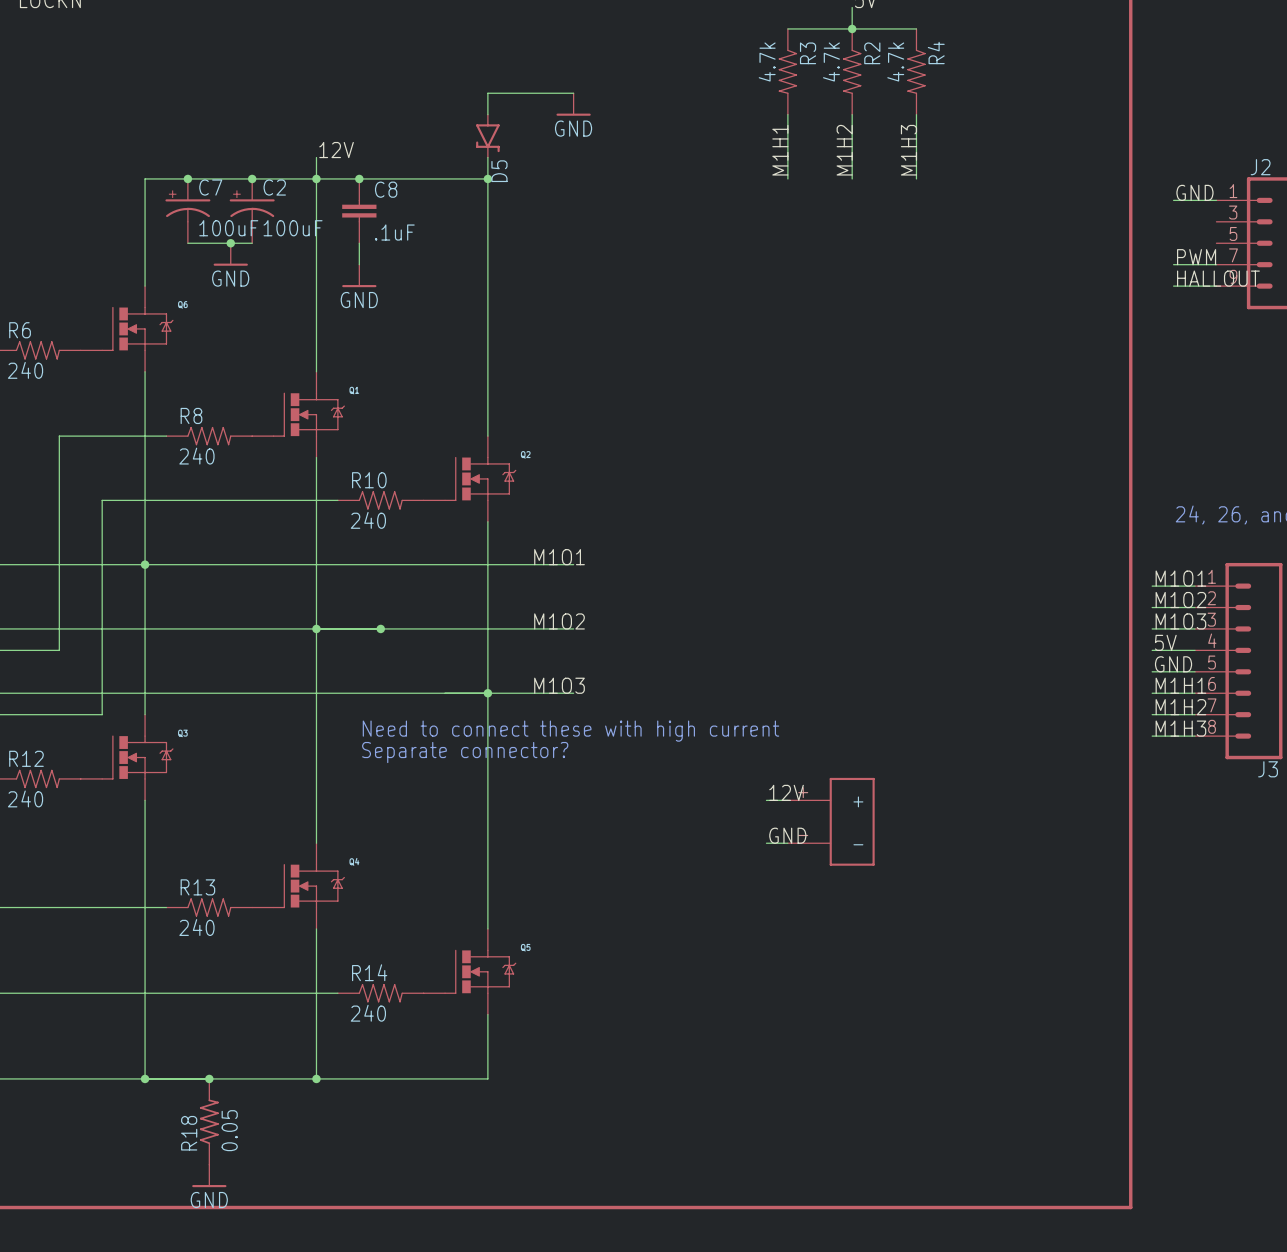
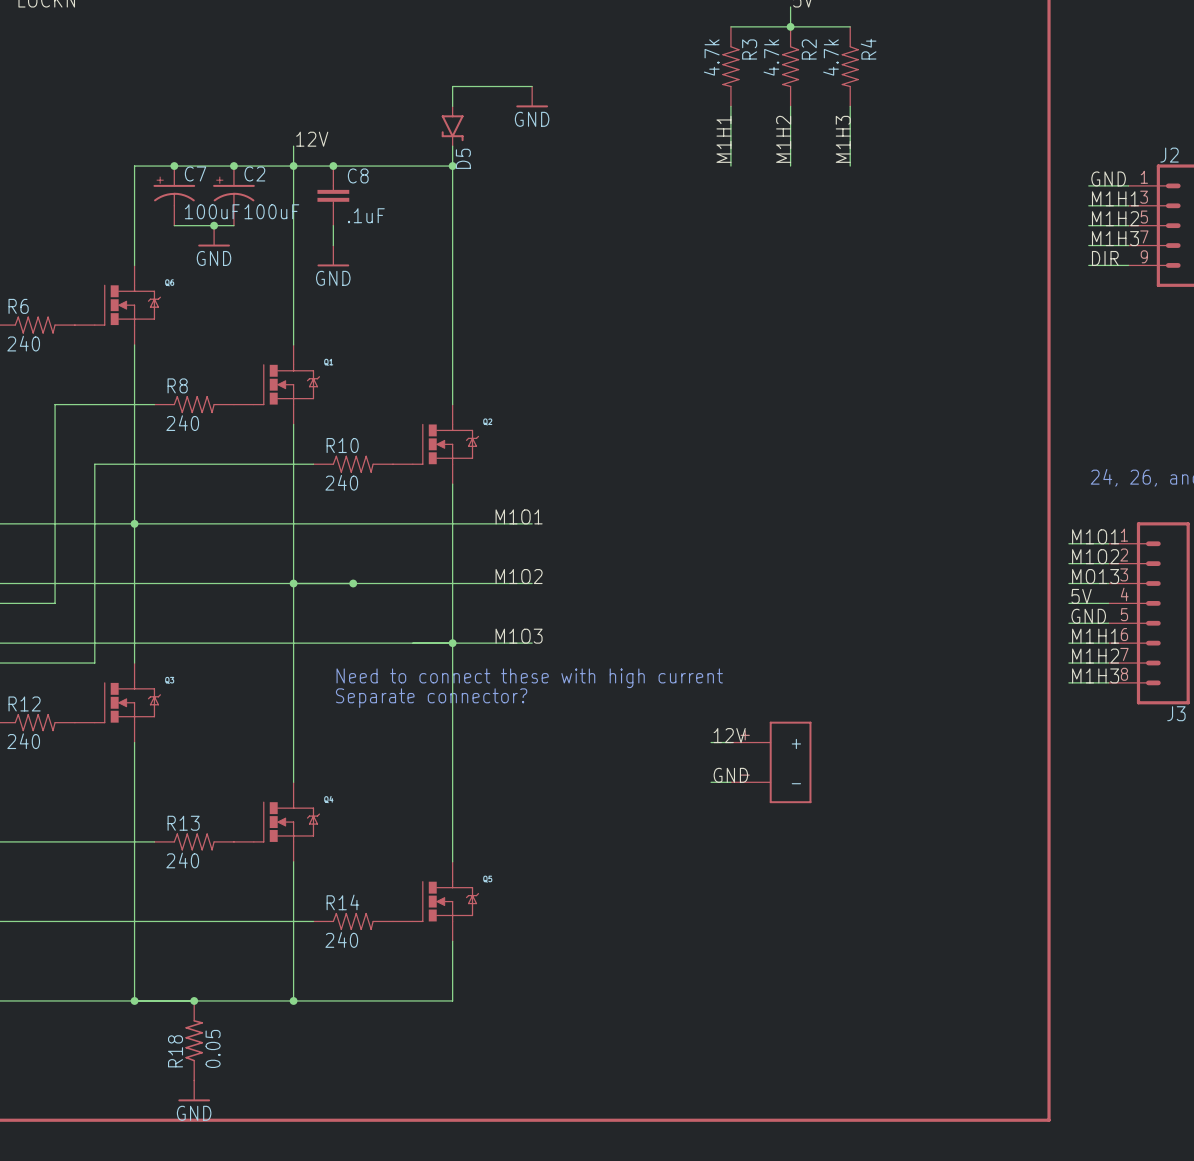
label: none -> M1H1 (1115, 198)
wire: none -> (1088, 205) (1128, 205)
label: none -> M1H2 (1115, 218)
wire: none -> (1088, 225) (1128, 225)
label: PWM (1196, 257) -> M1H3 (1115, 238)
label: HALLOUT (1218, 278) -> DIR (1105, 258)
label: M1O3 (1180, 621) -> MO13 (1095, 576)

